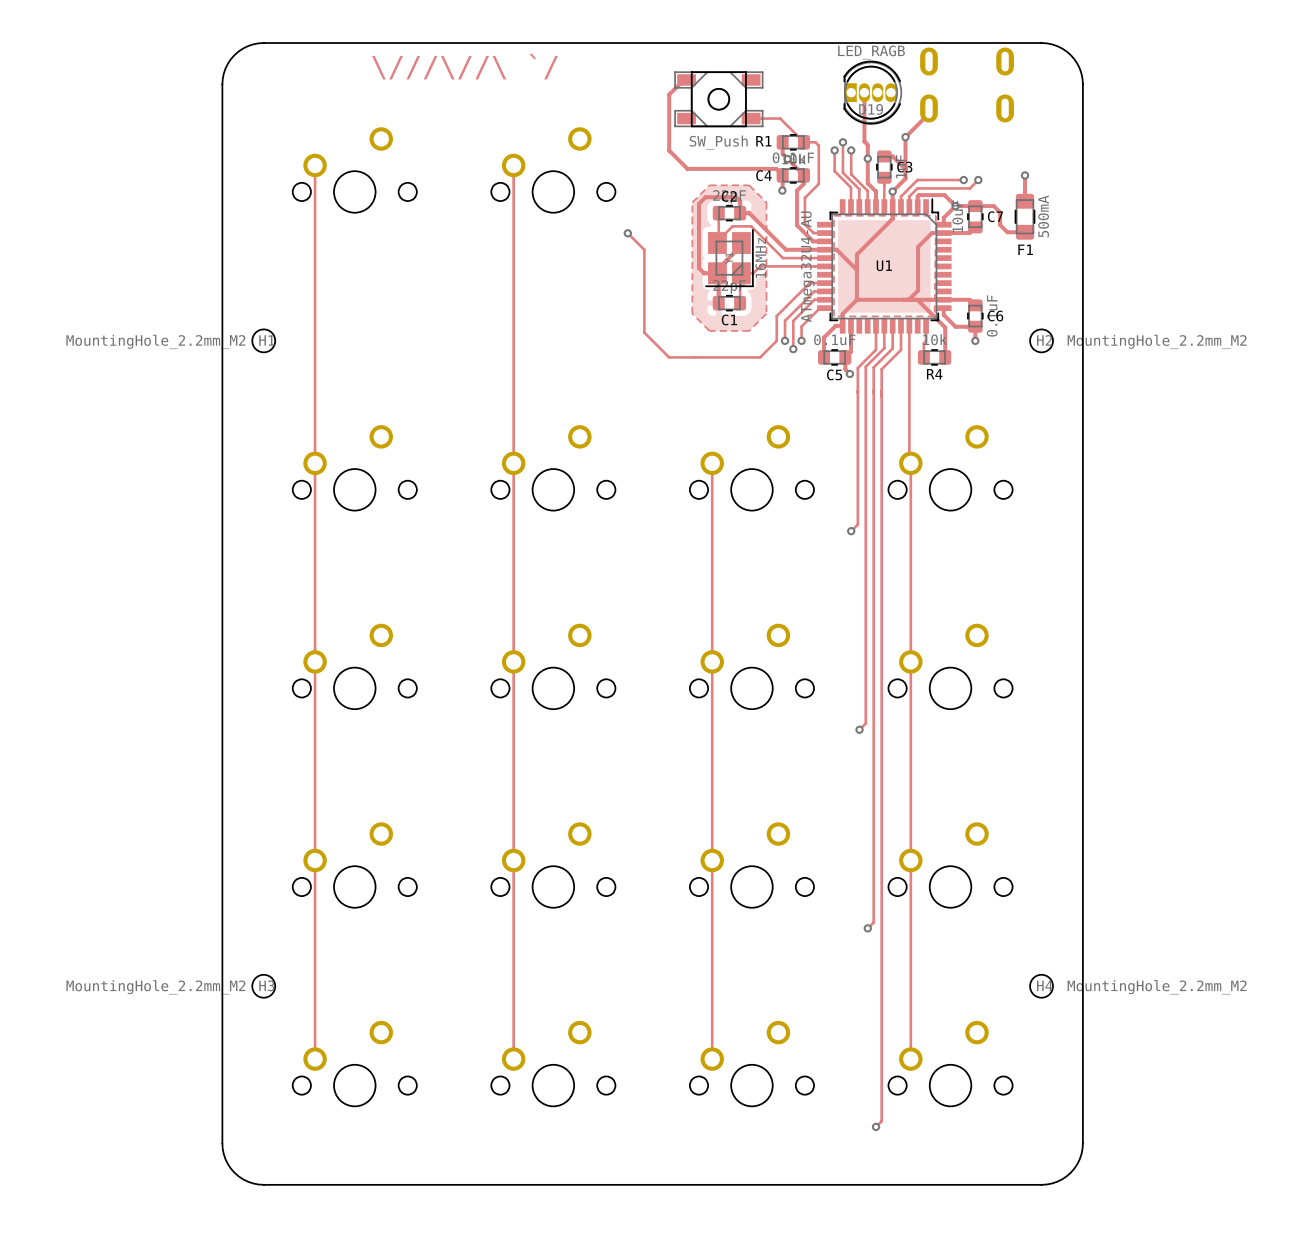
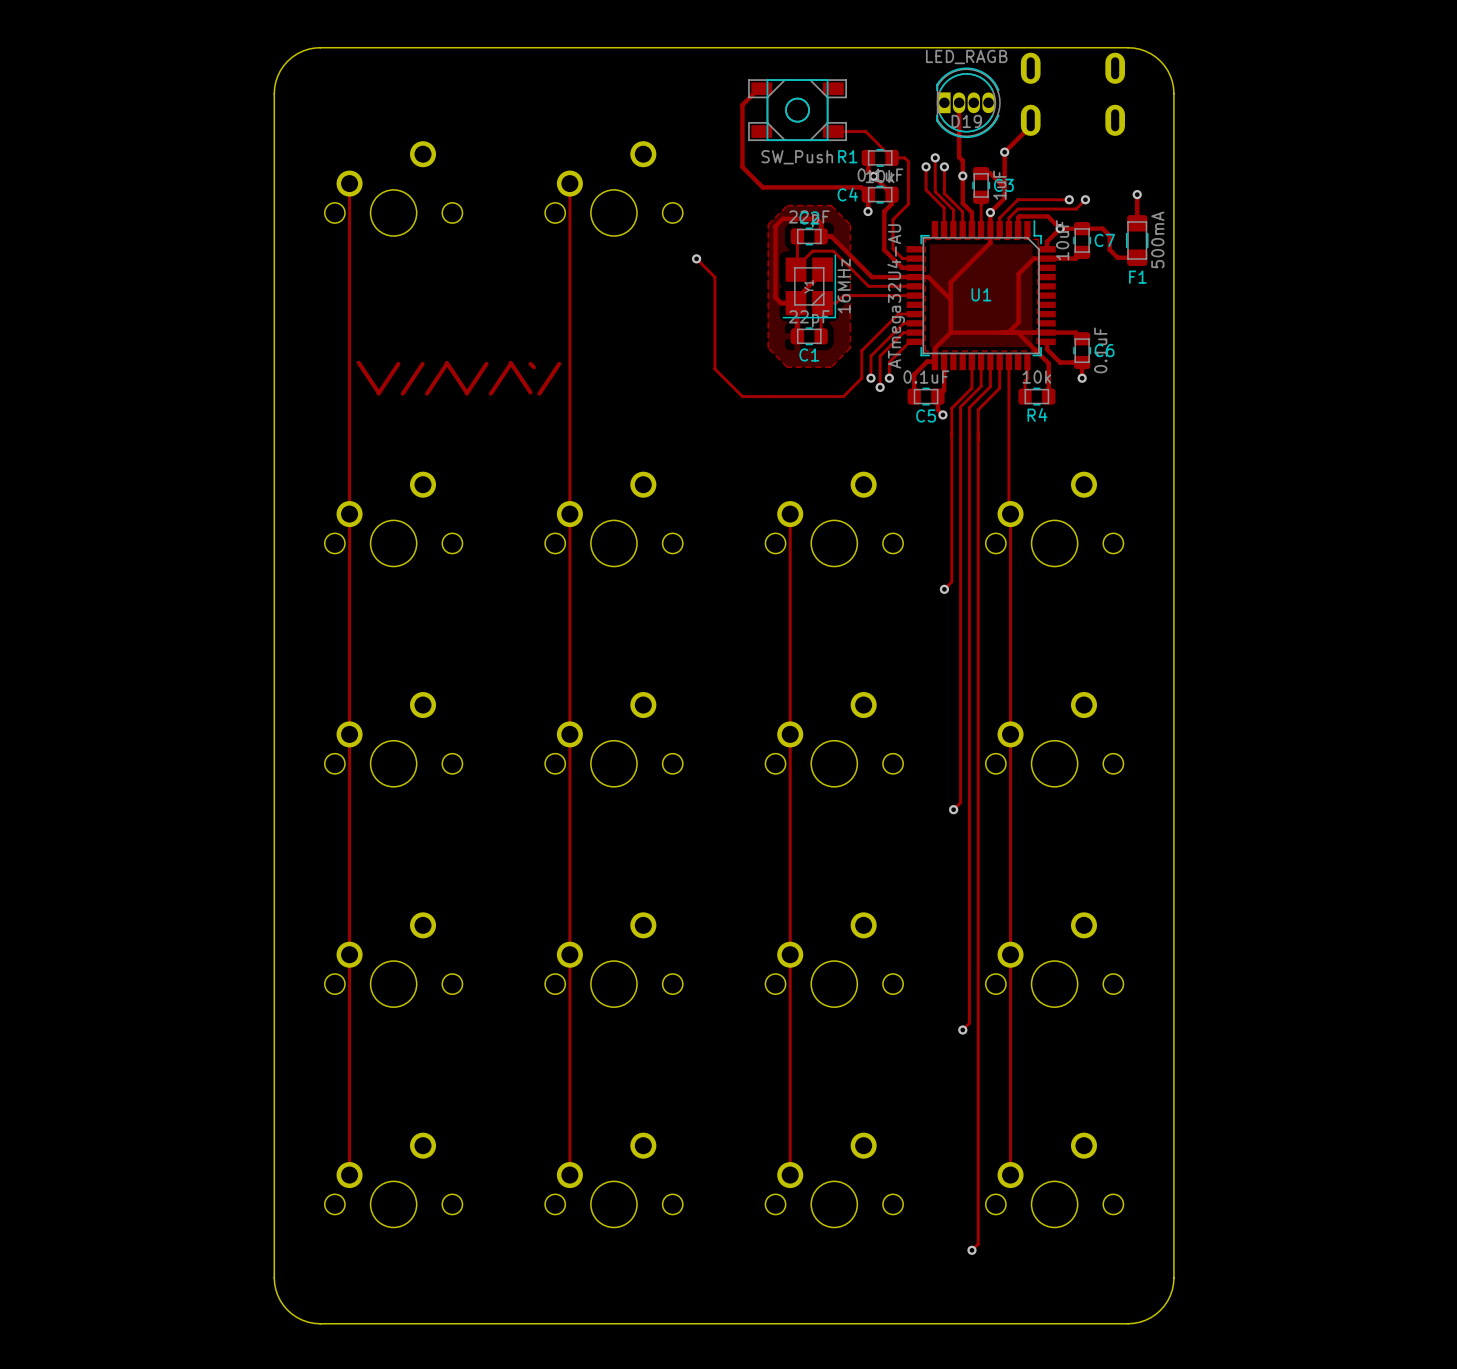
board edge: (288, 43) (258, 43) (243, 48) (227, 63) (222, 84) (222, 1143) (225, 1159) (234, 1172) (247, 1181) (263, 1184) (1041, 1184) (1062, 1179) (1077, 1164) (1082, 1143) (1082, 84) (1077, 63) (1062, 48) (1046, 43) (1016, 43) -> (1173, 93) (1170, 76) (1160, 61) (1145, 51) (1128, 47)
board edge: none -> (320, 47) (302, 51) (287, 61) (277, 76) (274, 93) (274, 1277) (275, 1289) (283, 1305) (292, 1314) (302, 1320) (320, 1323) (1128, 1323) (1145, 1320) (1160, 1310) (1170, 1295) (1173, 1277)
text: \///\//\ `/ (464, 66) -> none
board edge: none -> (1173, 93) (1173, 1277)
text: none -> \///\//\`/ (458, 378)
H1: MountingHole_2.2mm_M2 (263, 340) -> none
H2: MountingHole_2.2mm_M2 (1041, 340) -> none
H3: MountingHole_2.2mm_M2 (263, 986) -> none
H4: MountingHole_2.2mm_M2 (1041, 986) -> none

